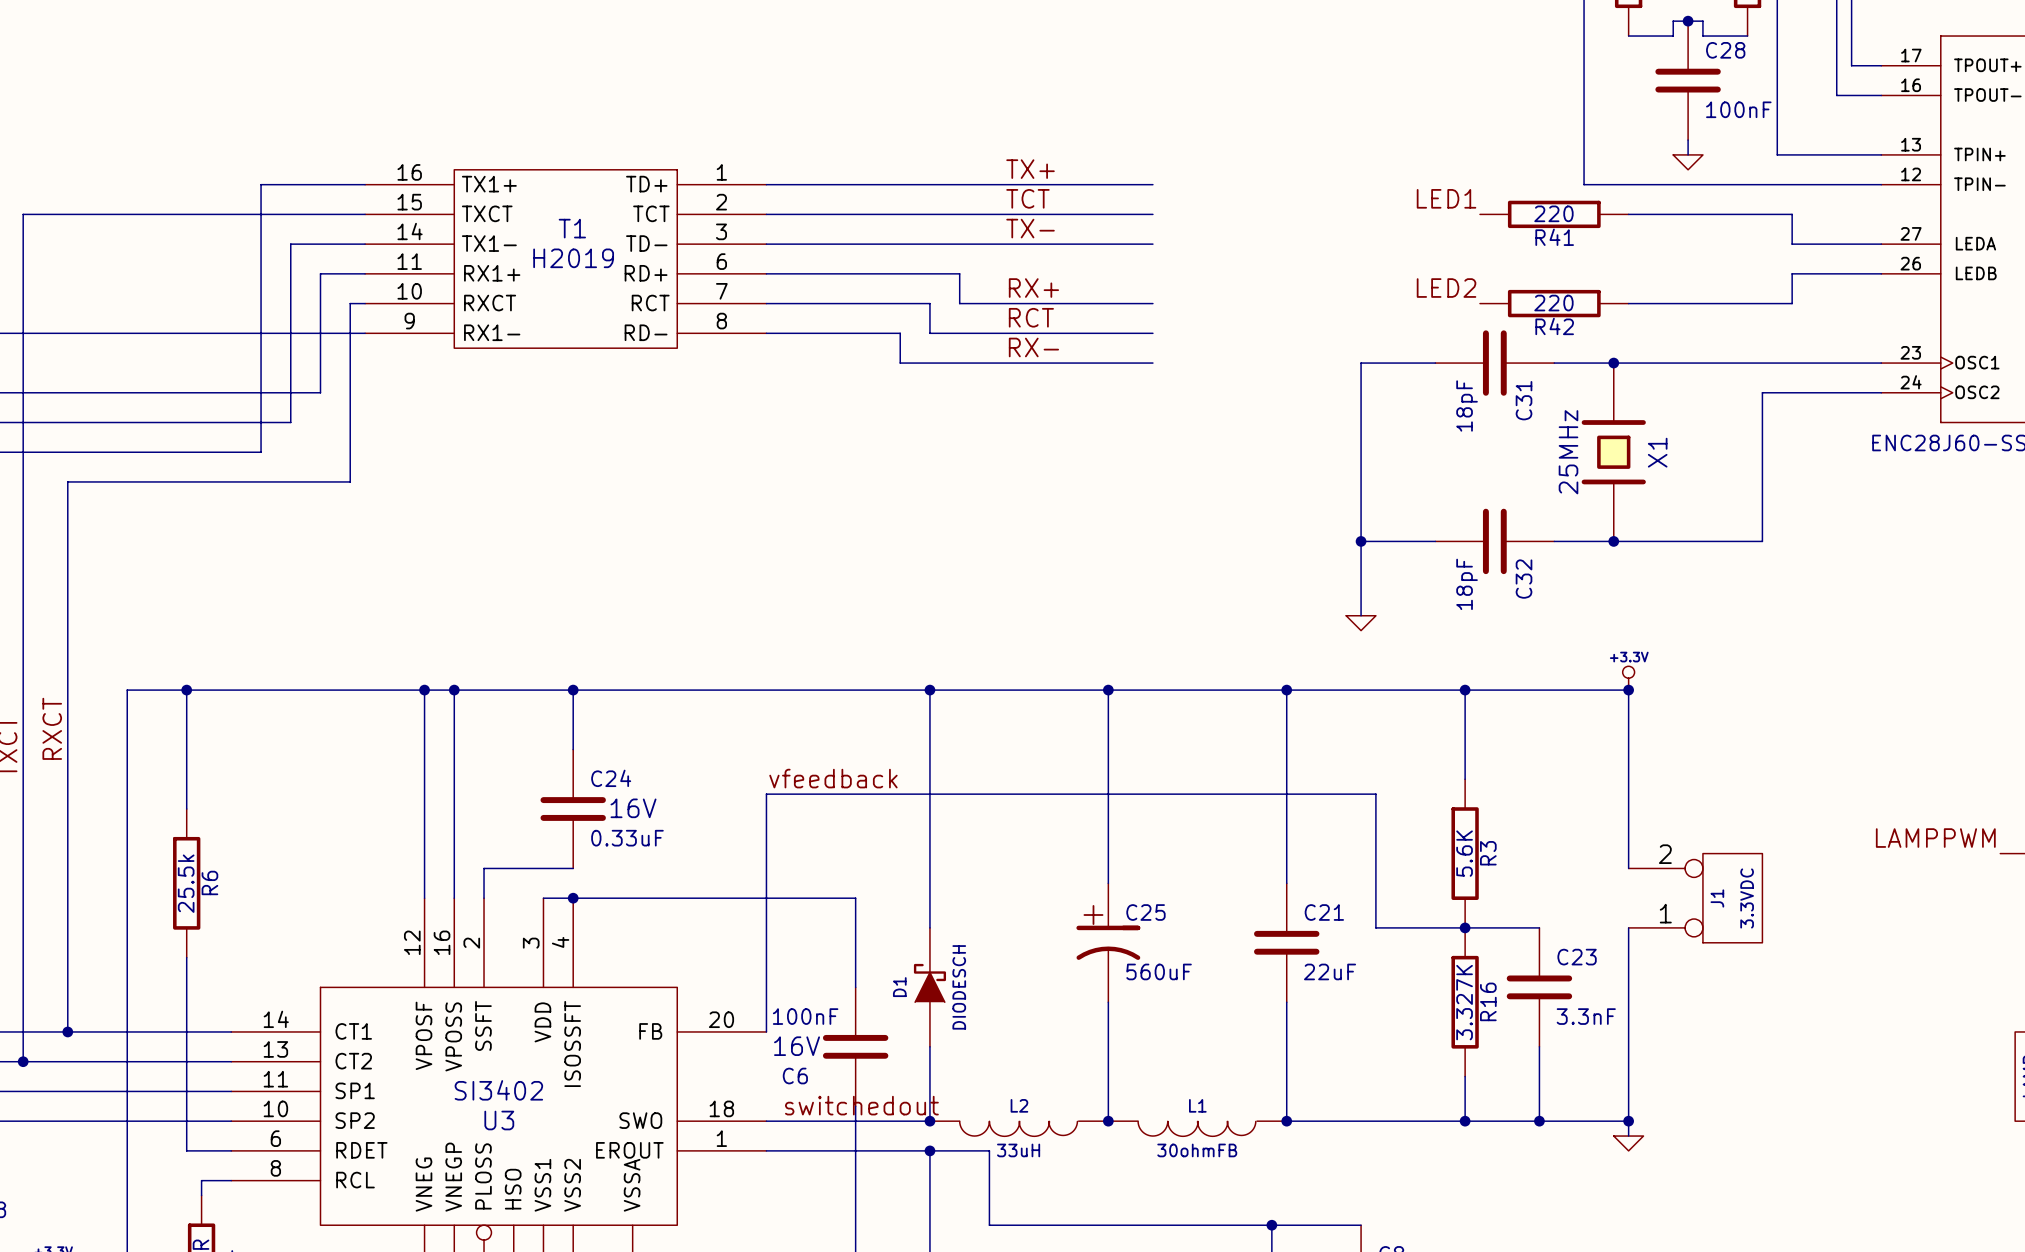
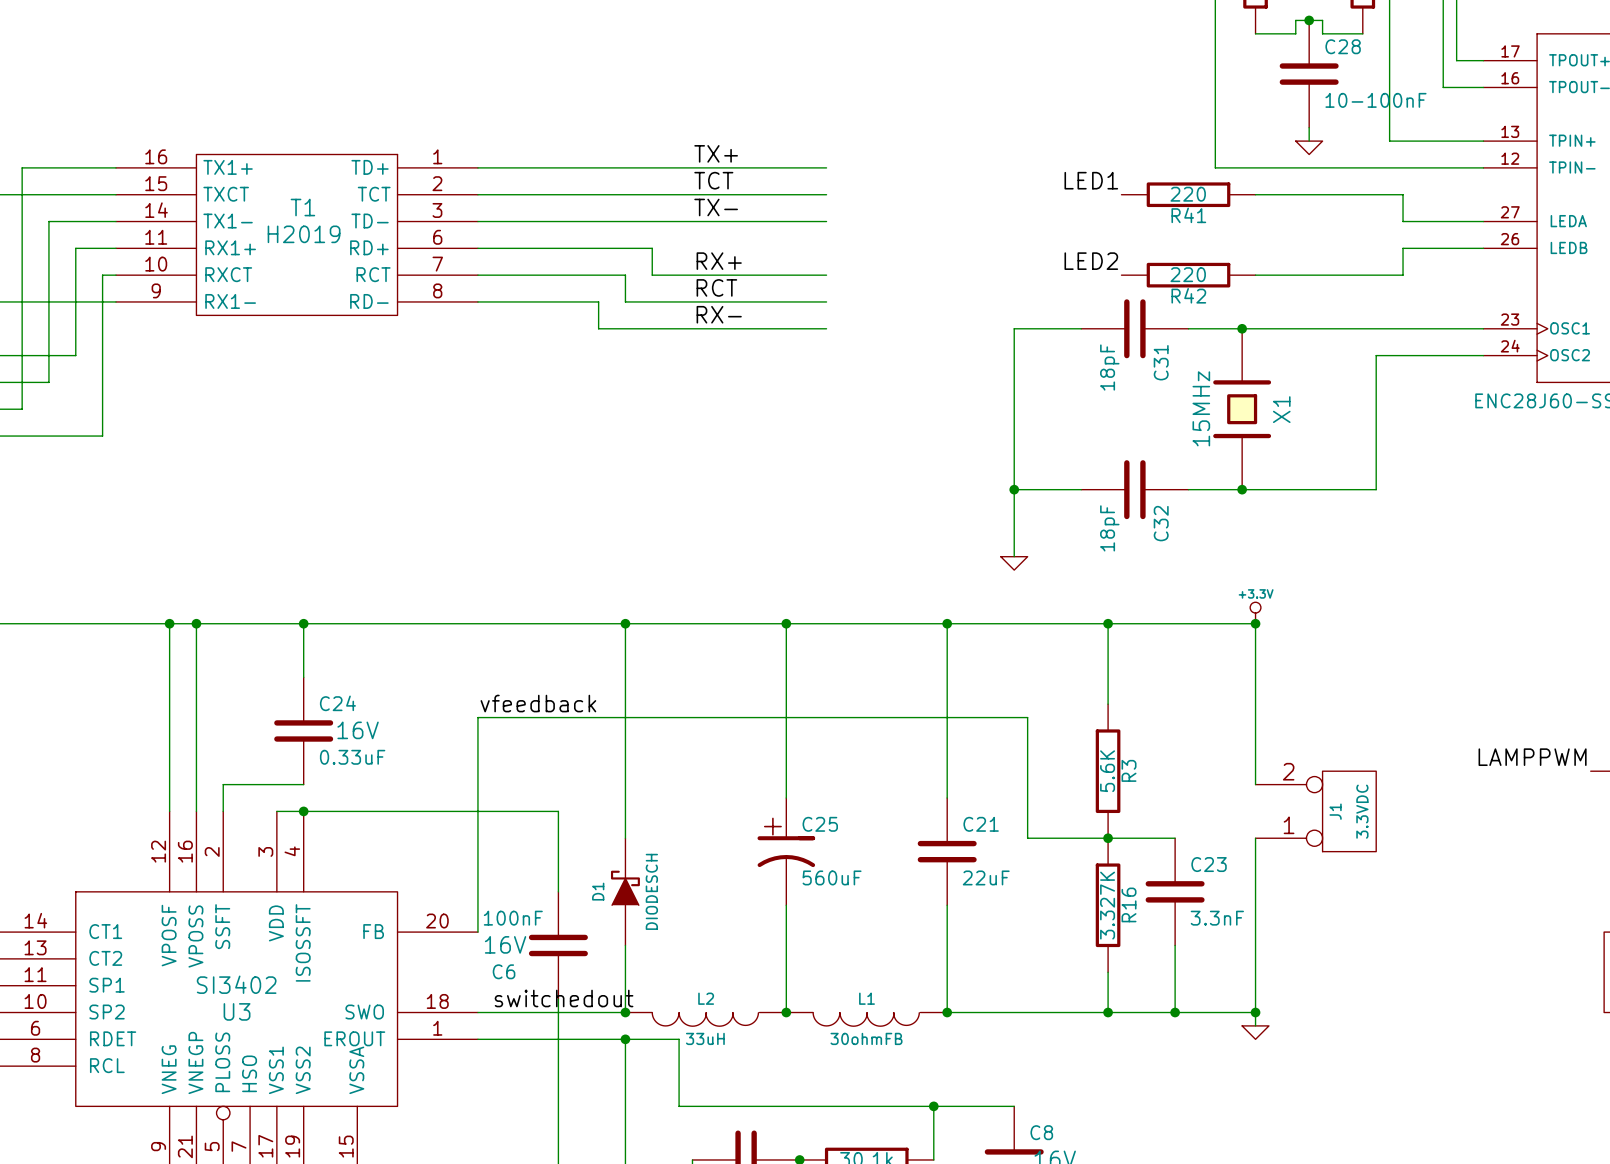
C28 value: 100nF (1738, 109) -> 10-100nF (1375, 100)
X1 value: 25MHz (1568, 452) -> 15MHz (1201, 408)

